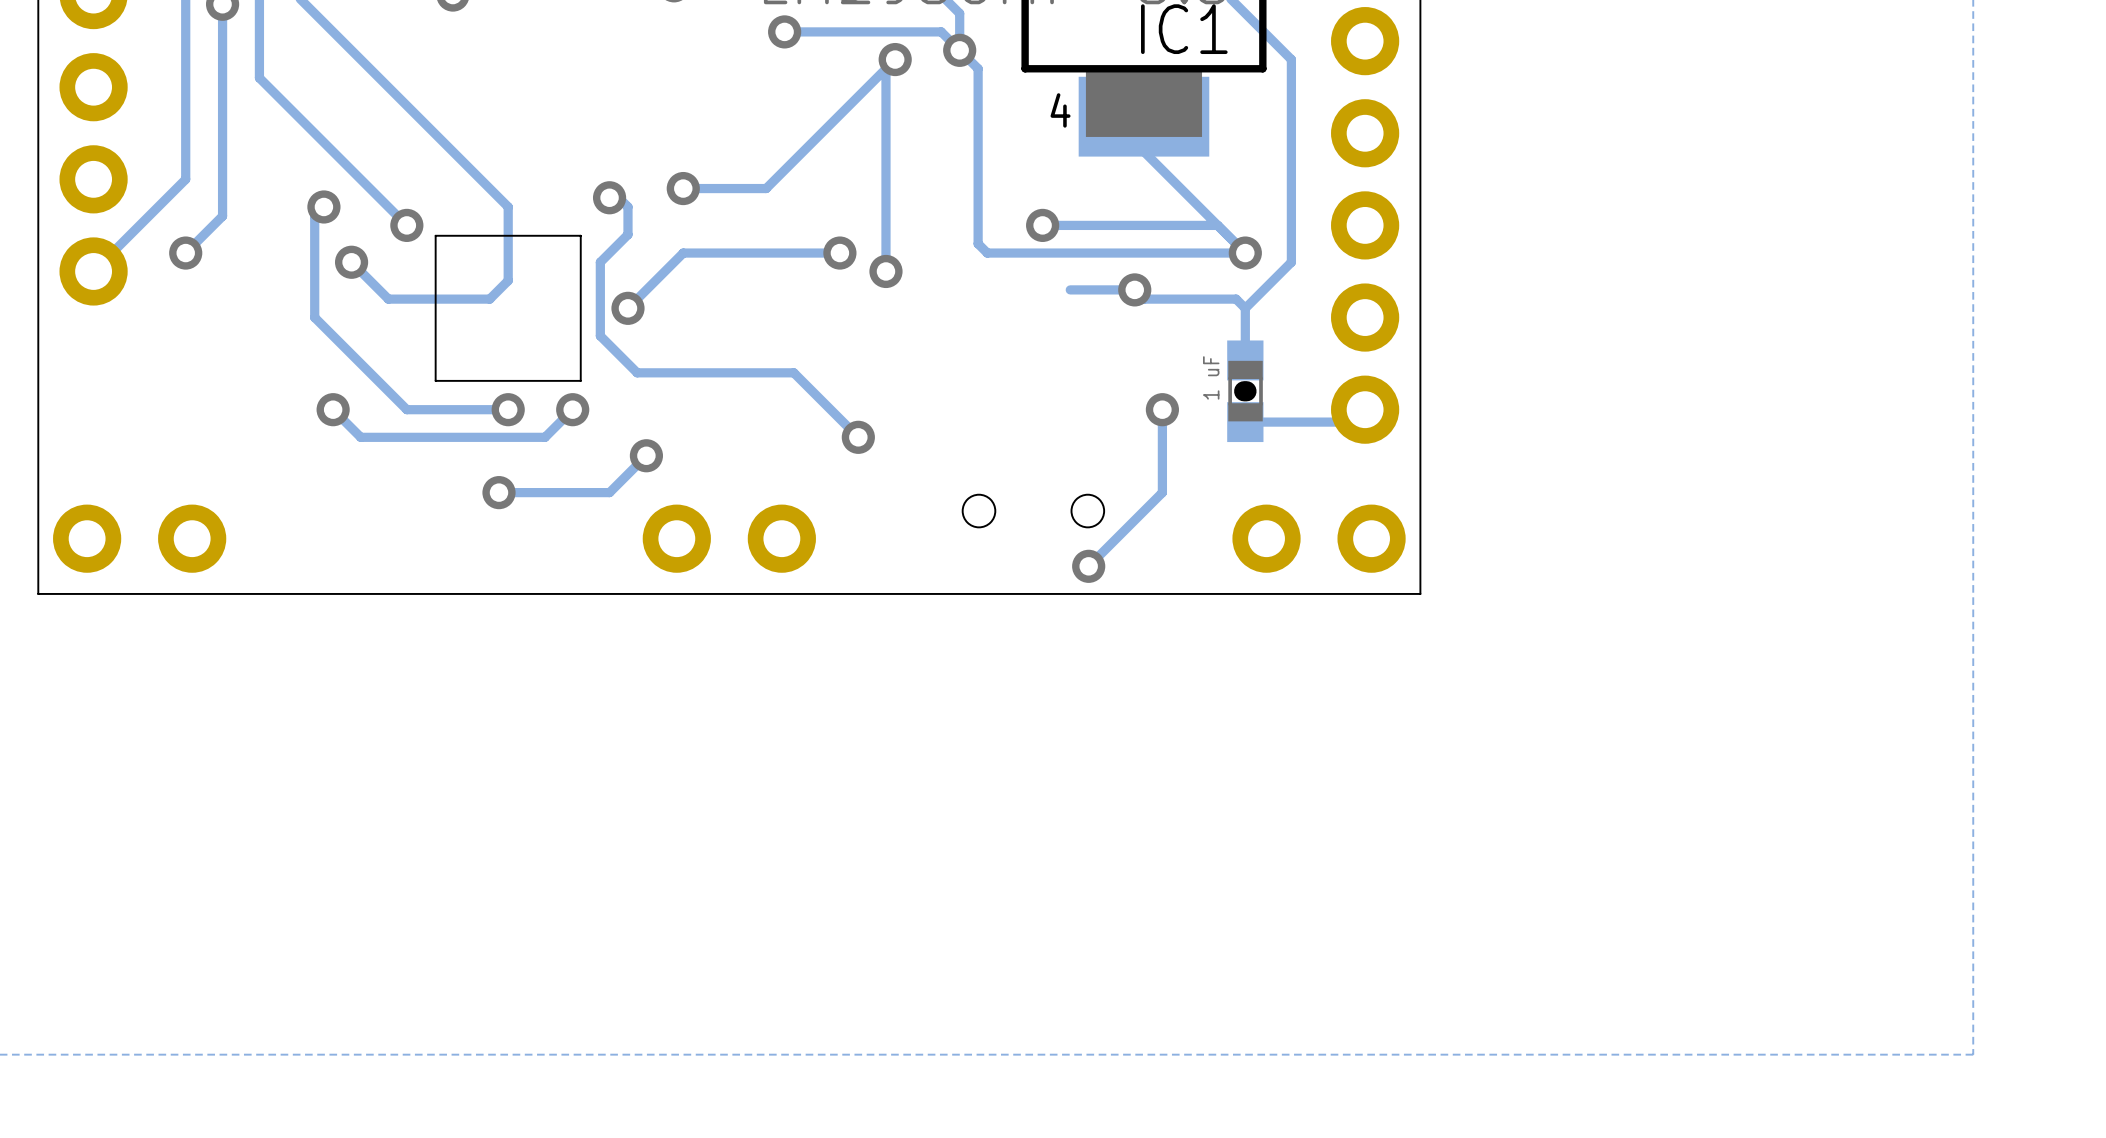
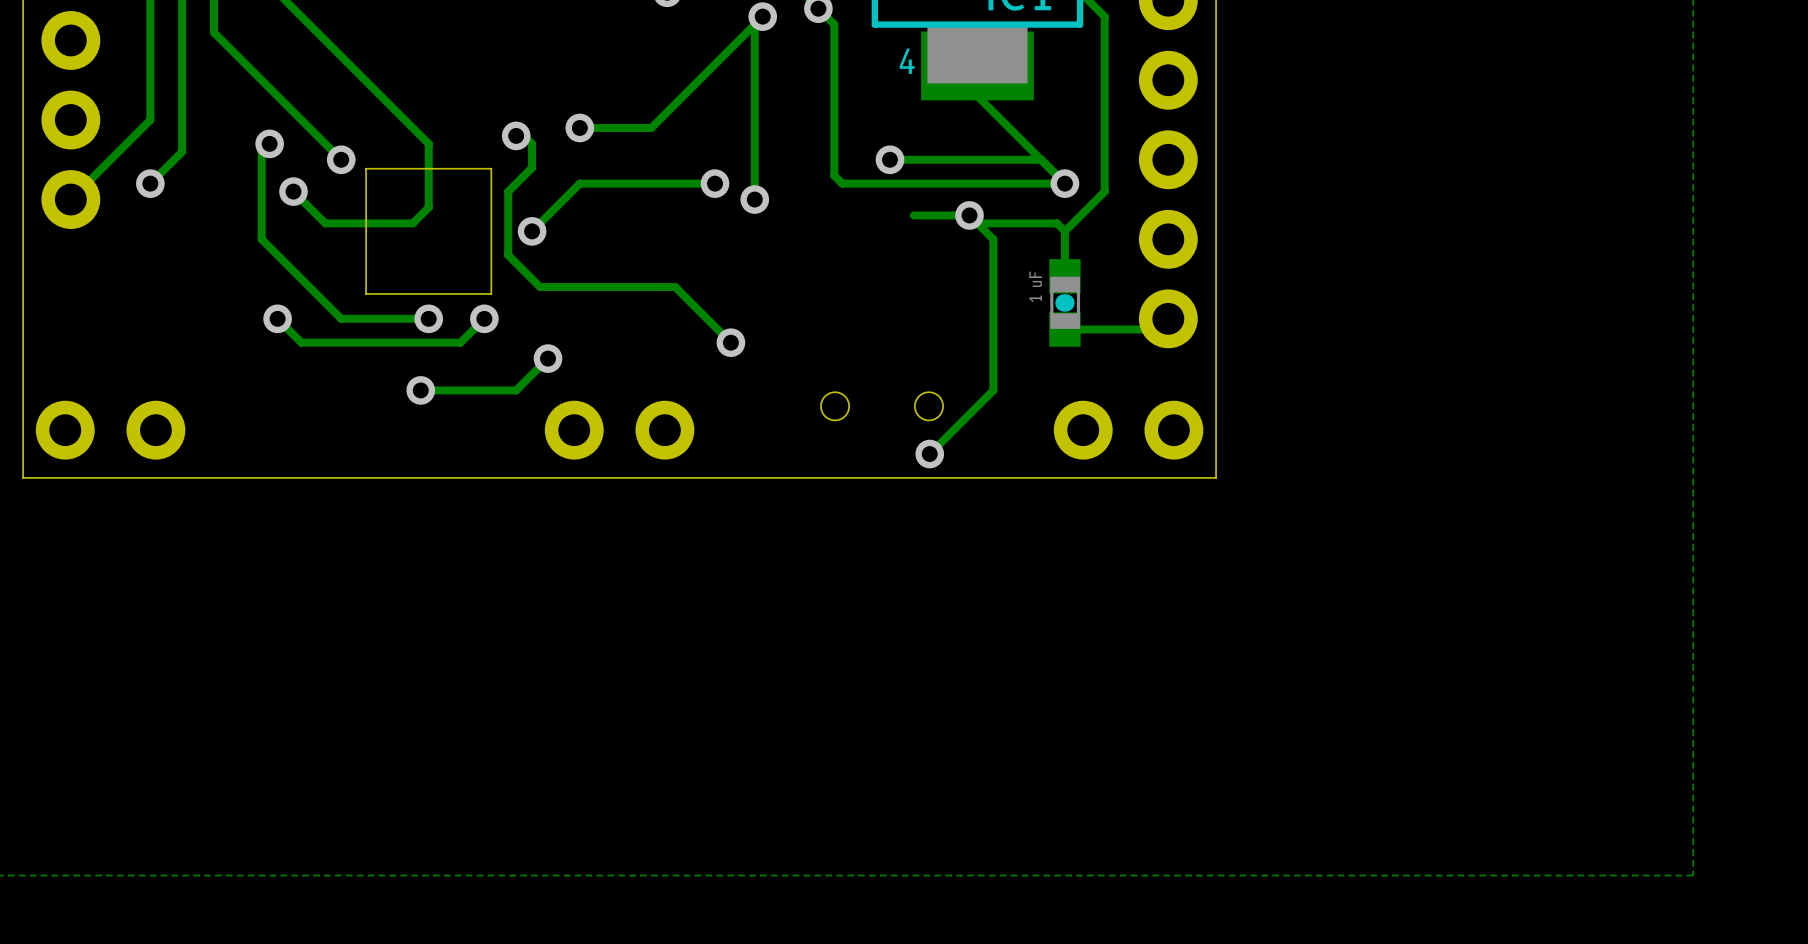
track: none -> (977, 223) (993, 239) (993, 318)
via: (1162, 409) -> none

